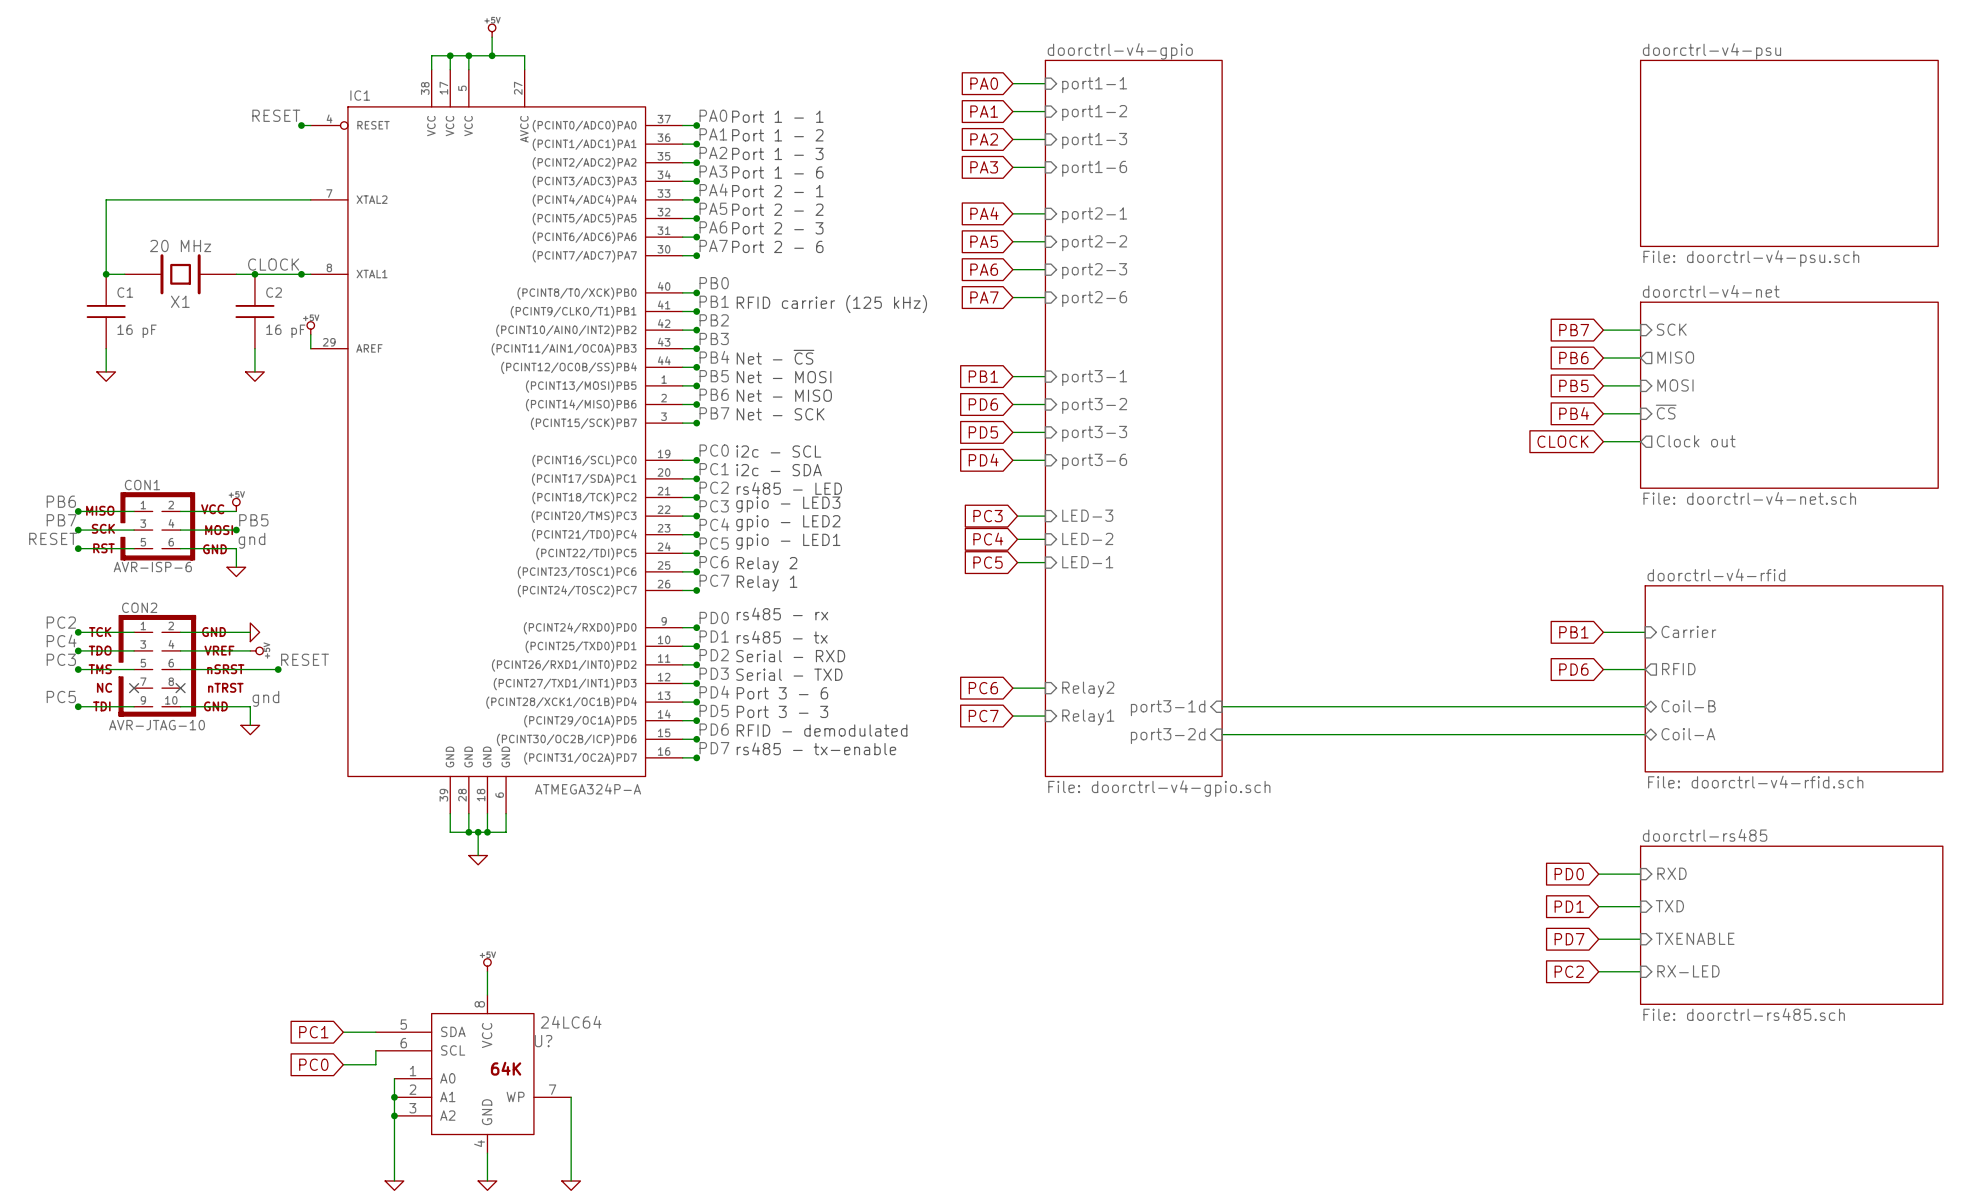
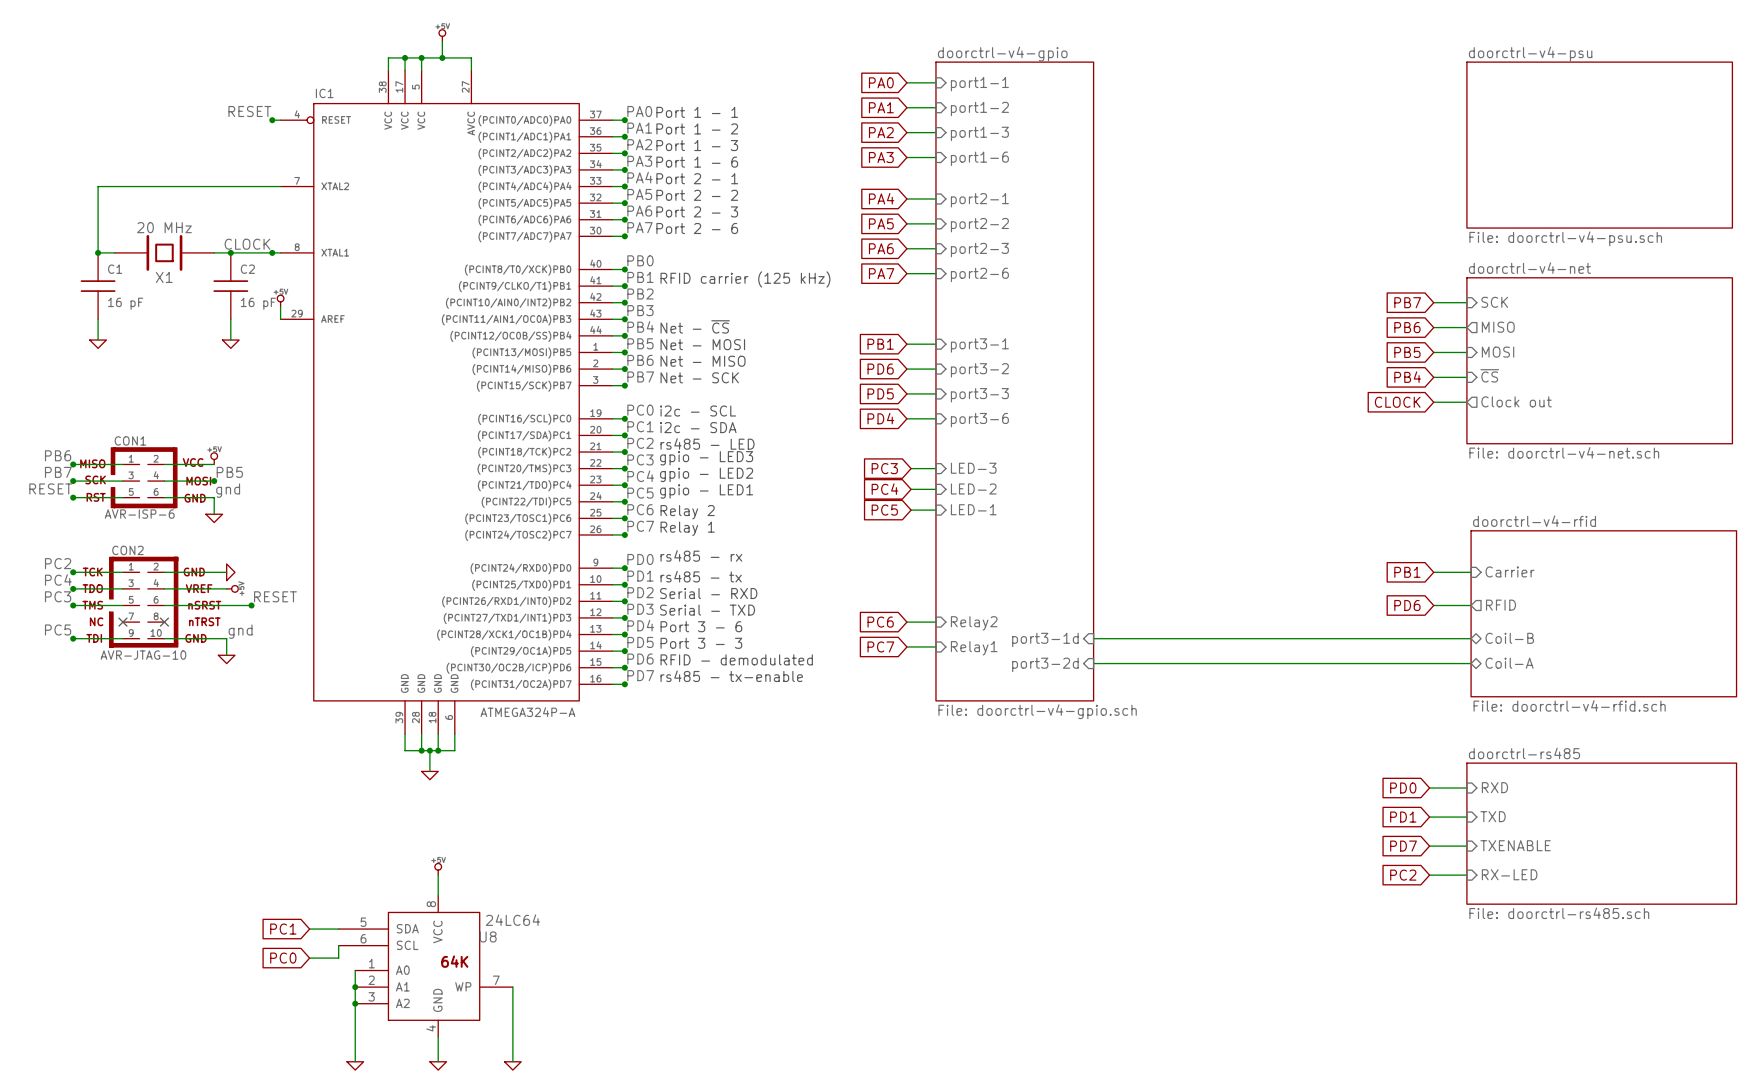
U? name: U? (543, 1041) -> U8 (488, 936)

